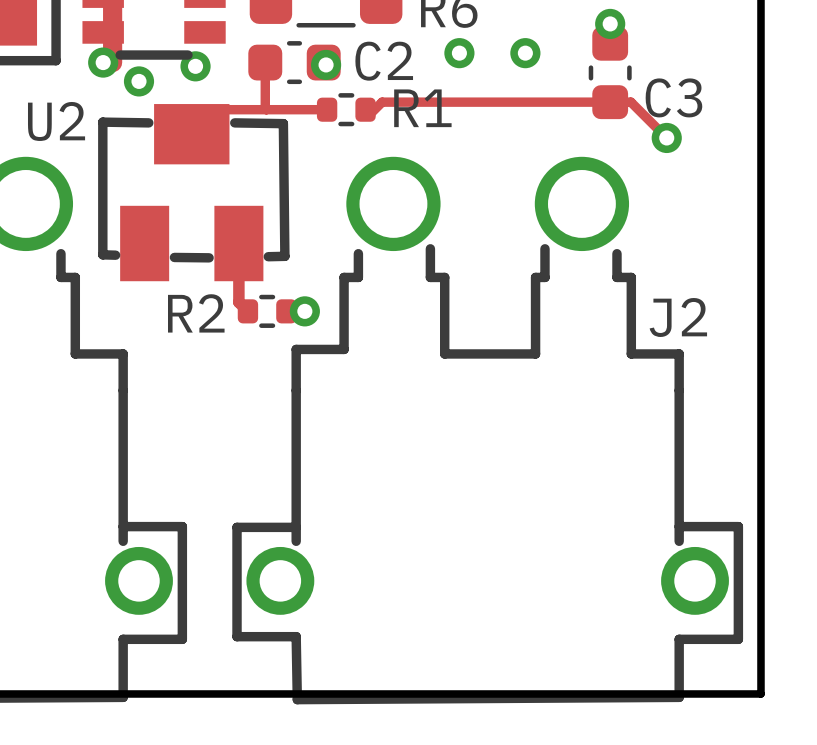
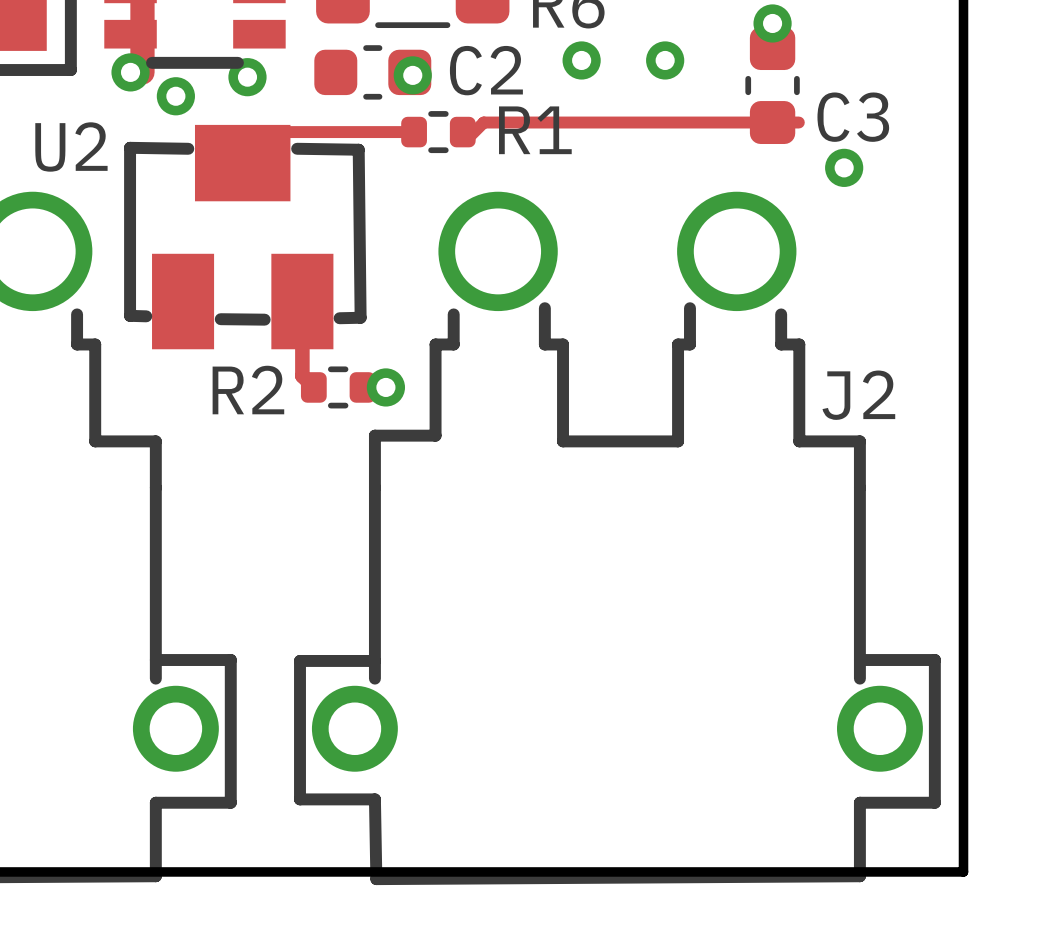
track: (265, 62) (266, 109) -> none
track: (630, 102) (666, 137) -> none

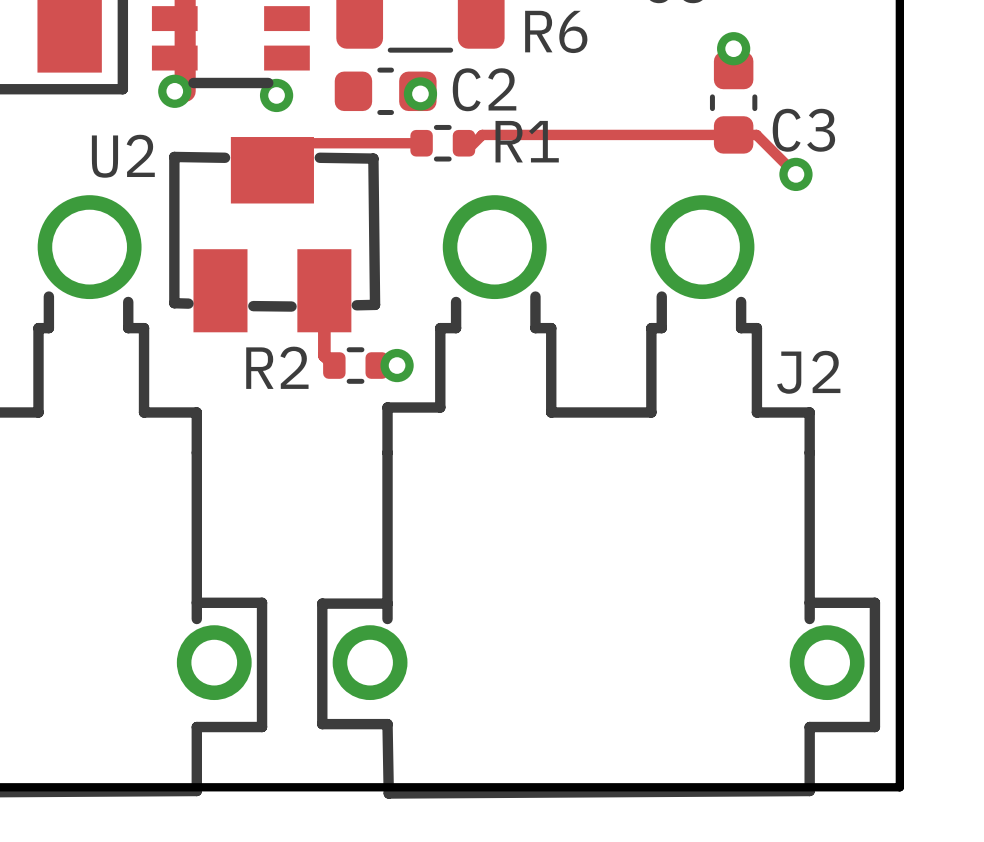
via: (581, 60) -> none
via: (665, 60) -> none
via: (175, 96) -> none
track: none -> (756, 134) (795, 174)

